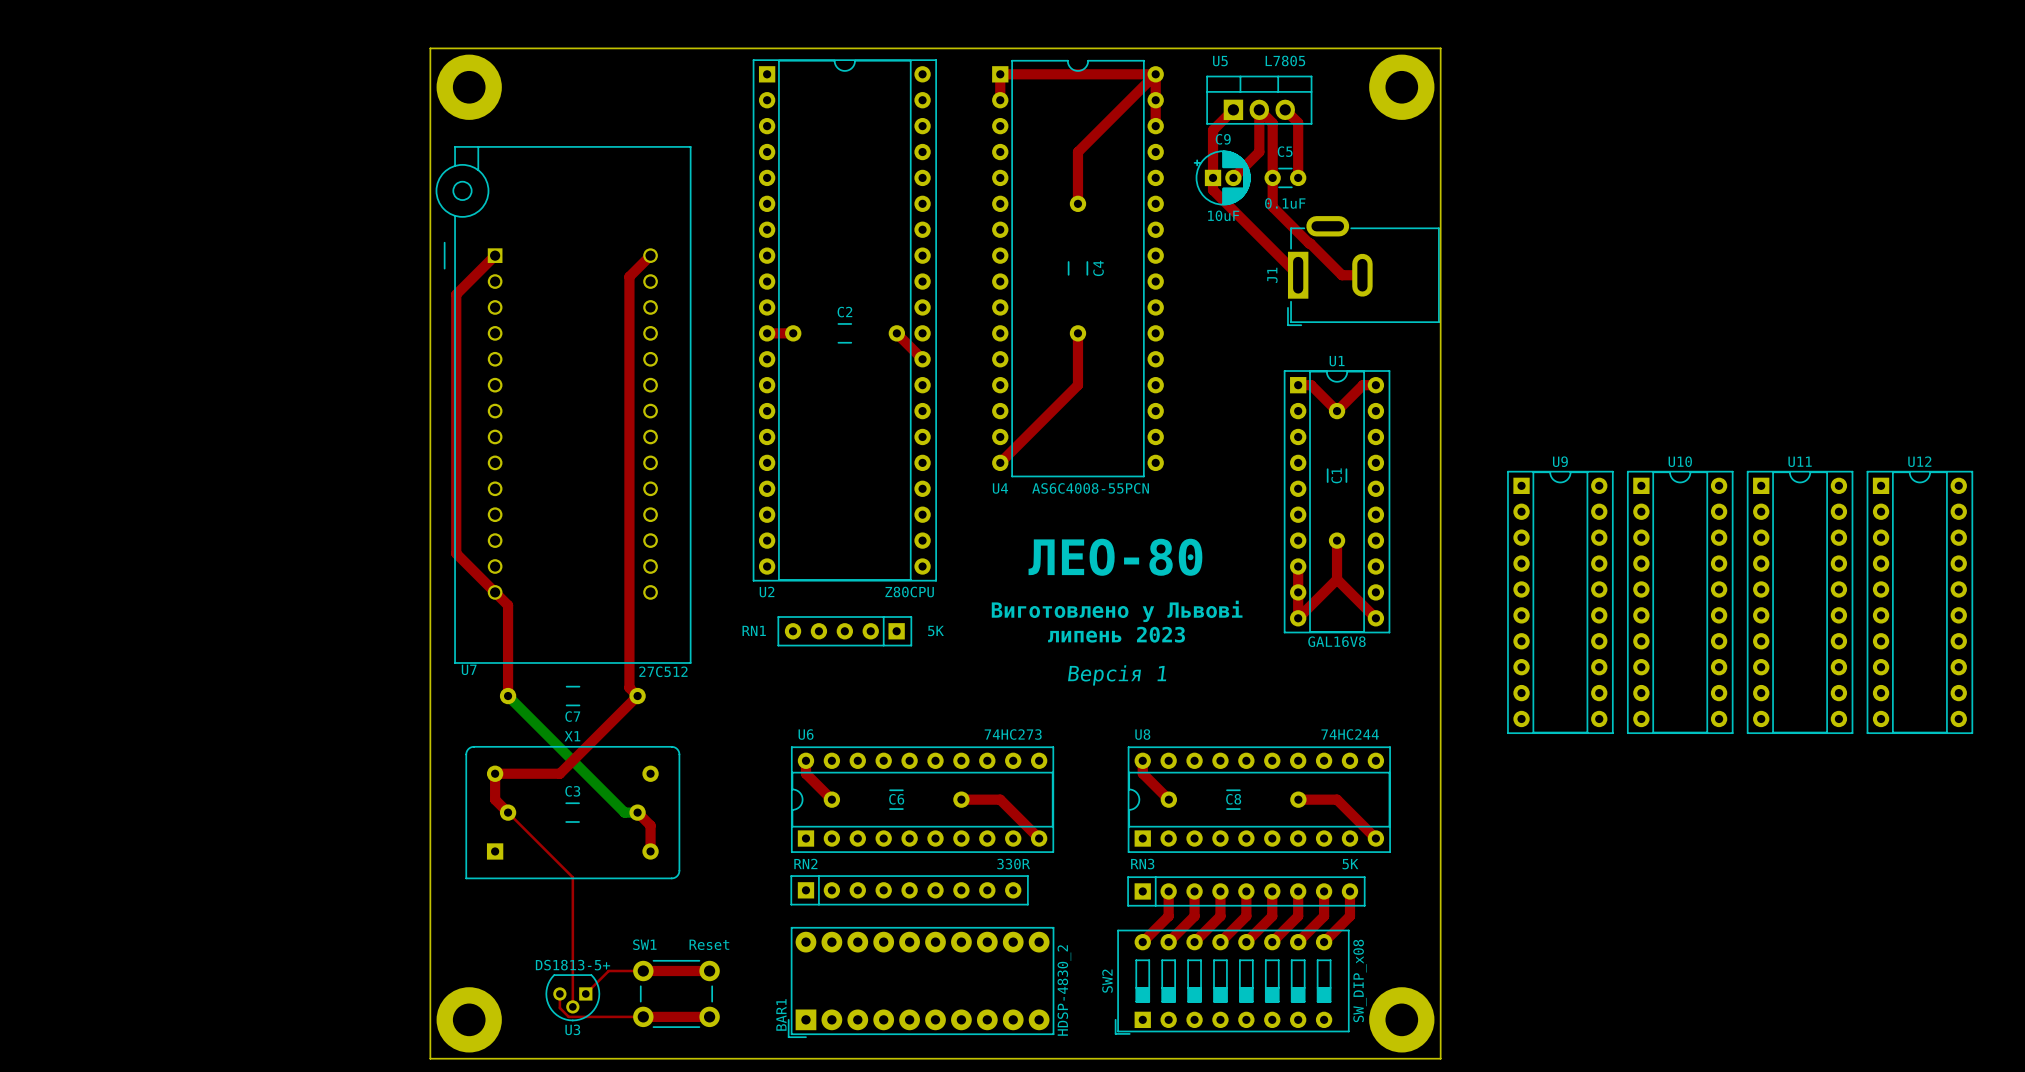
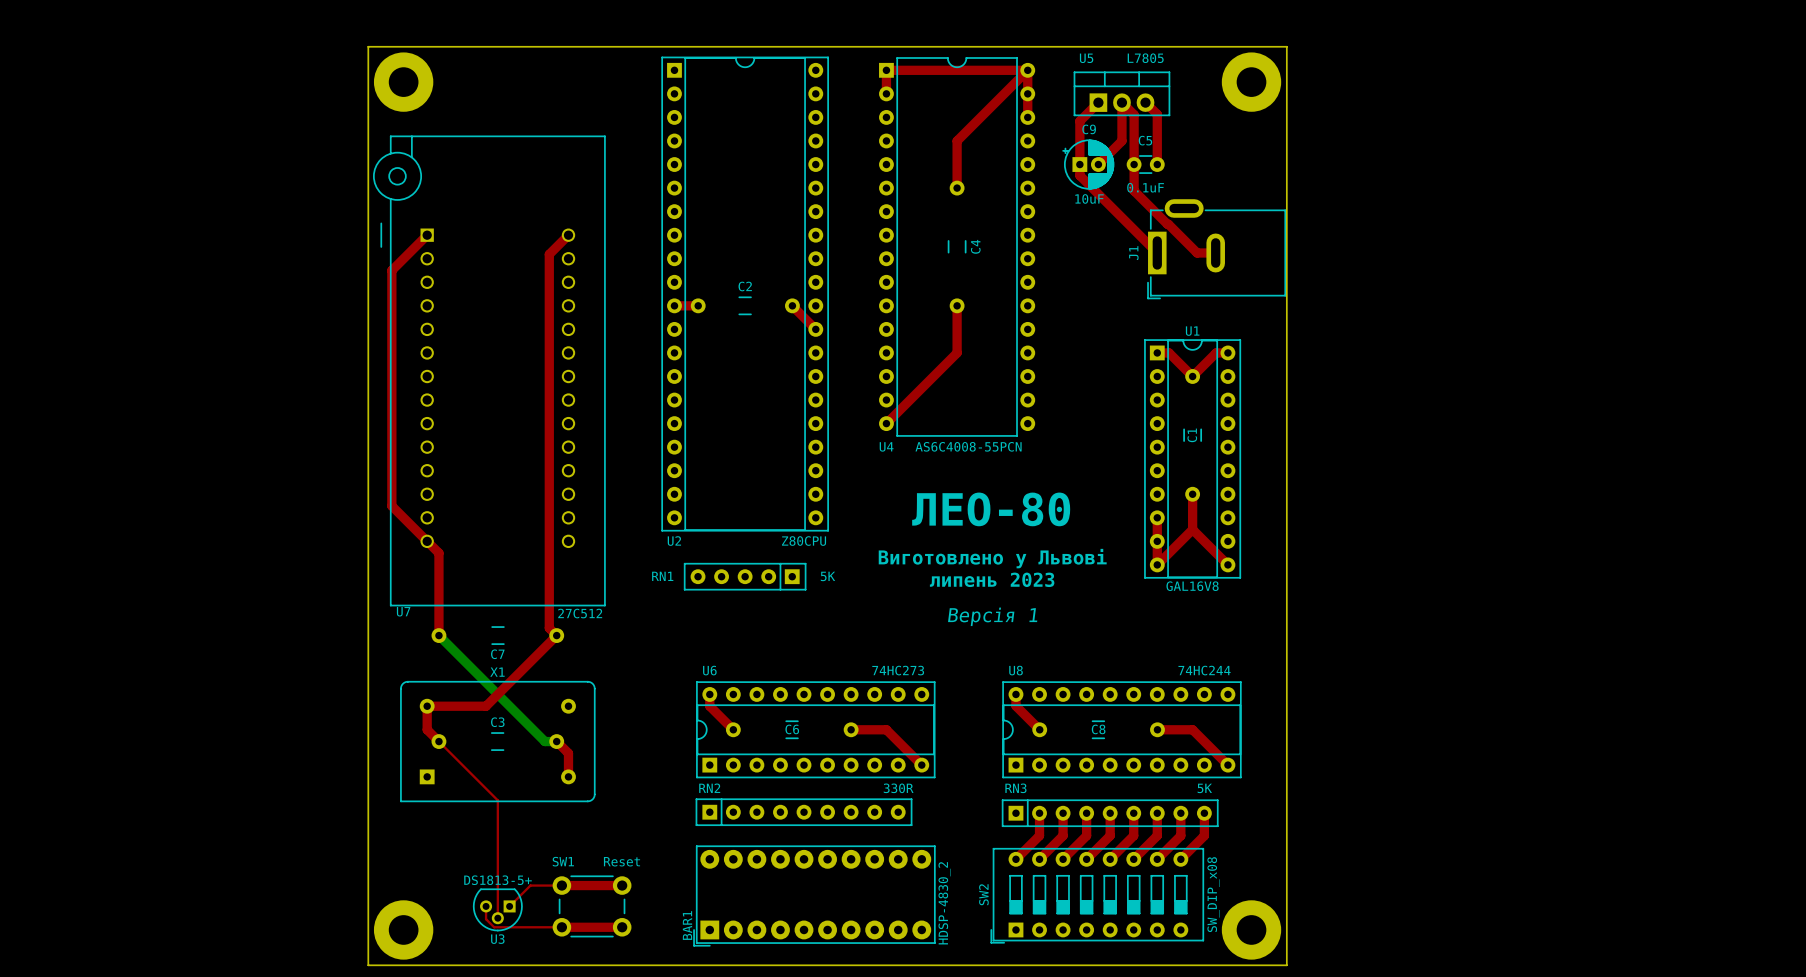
U9: (1560, 602) -> none
U10: (1680, 602) -> none
U11: (1800, 602) -> none
U12: (1919, 602) -> none

